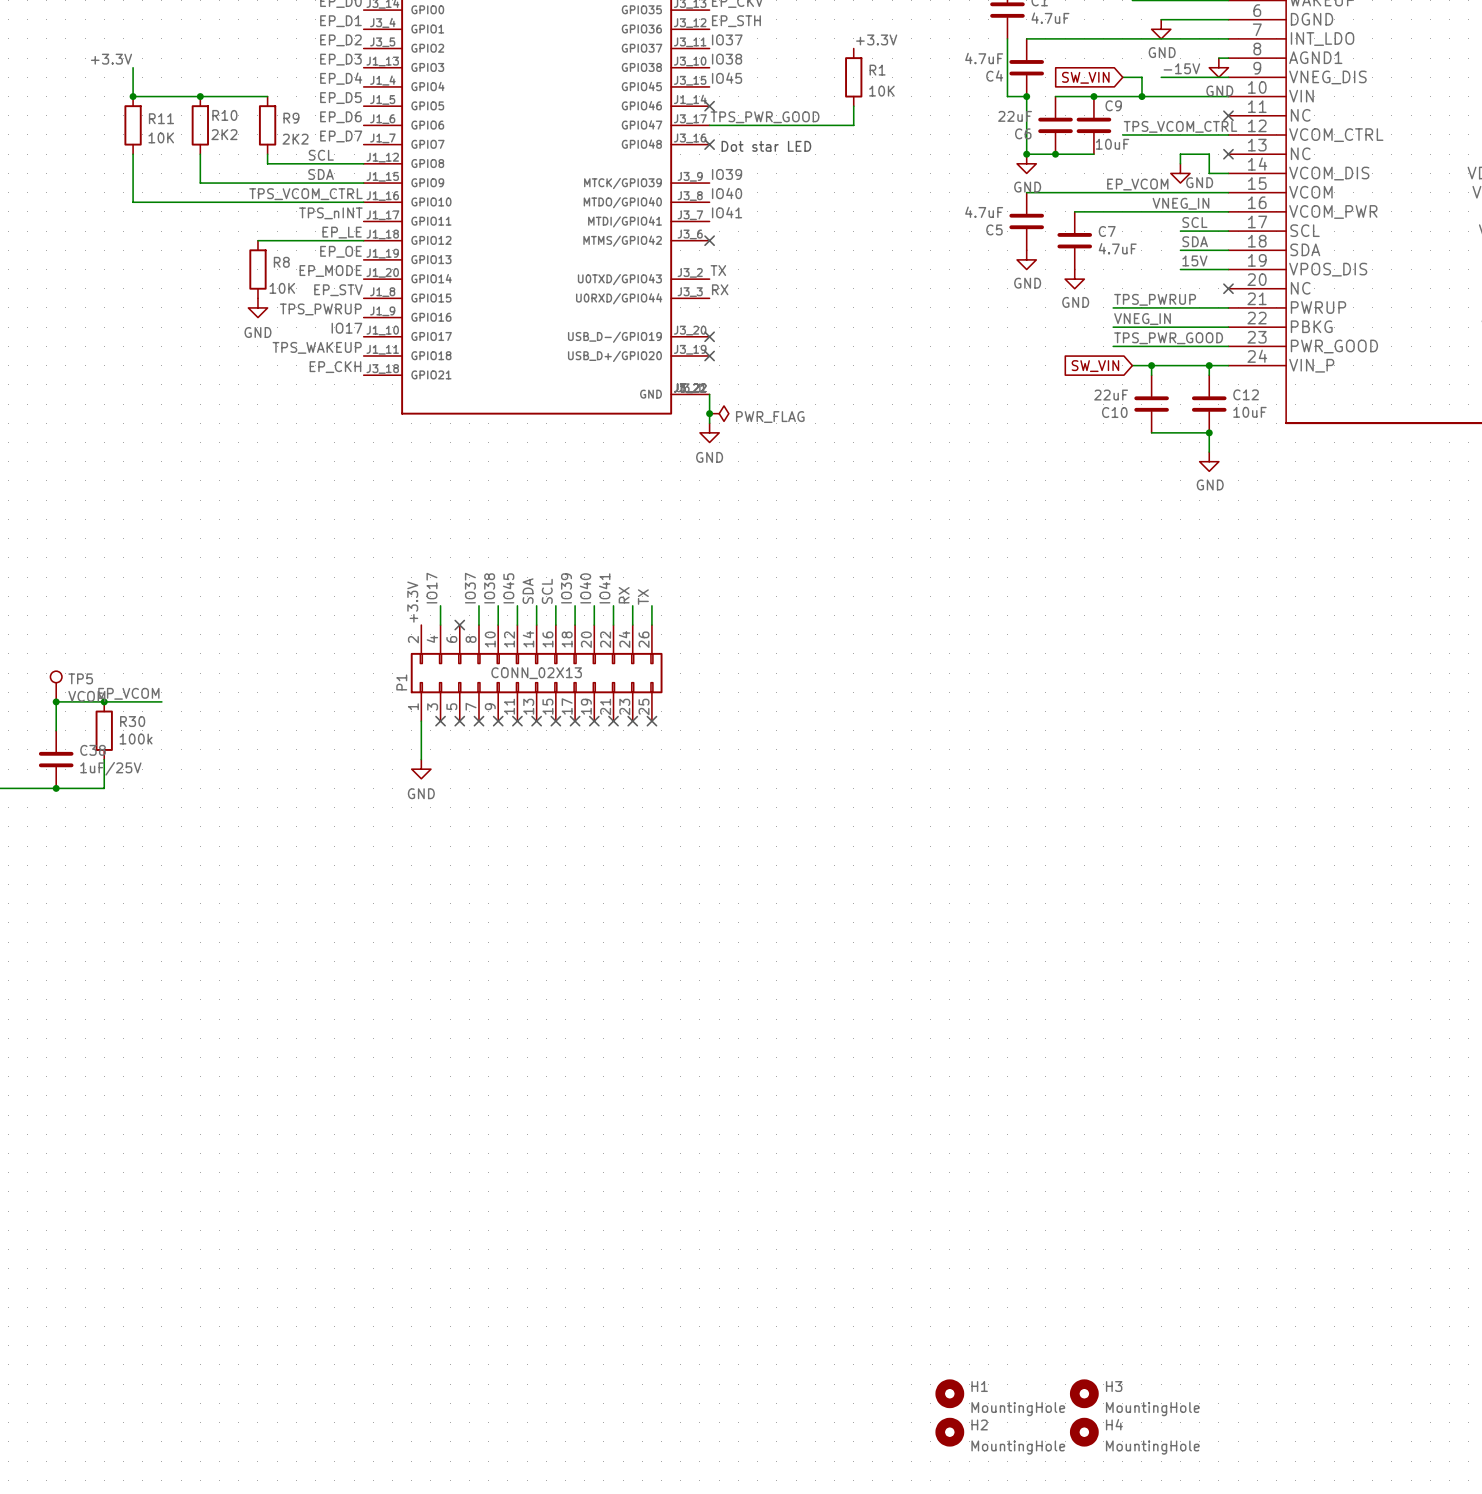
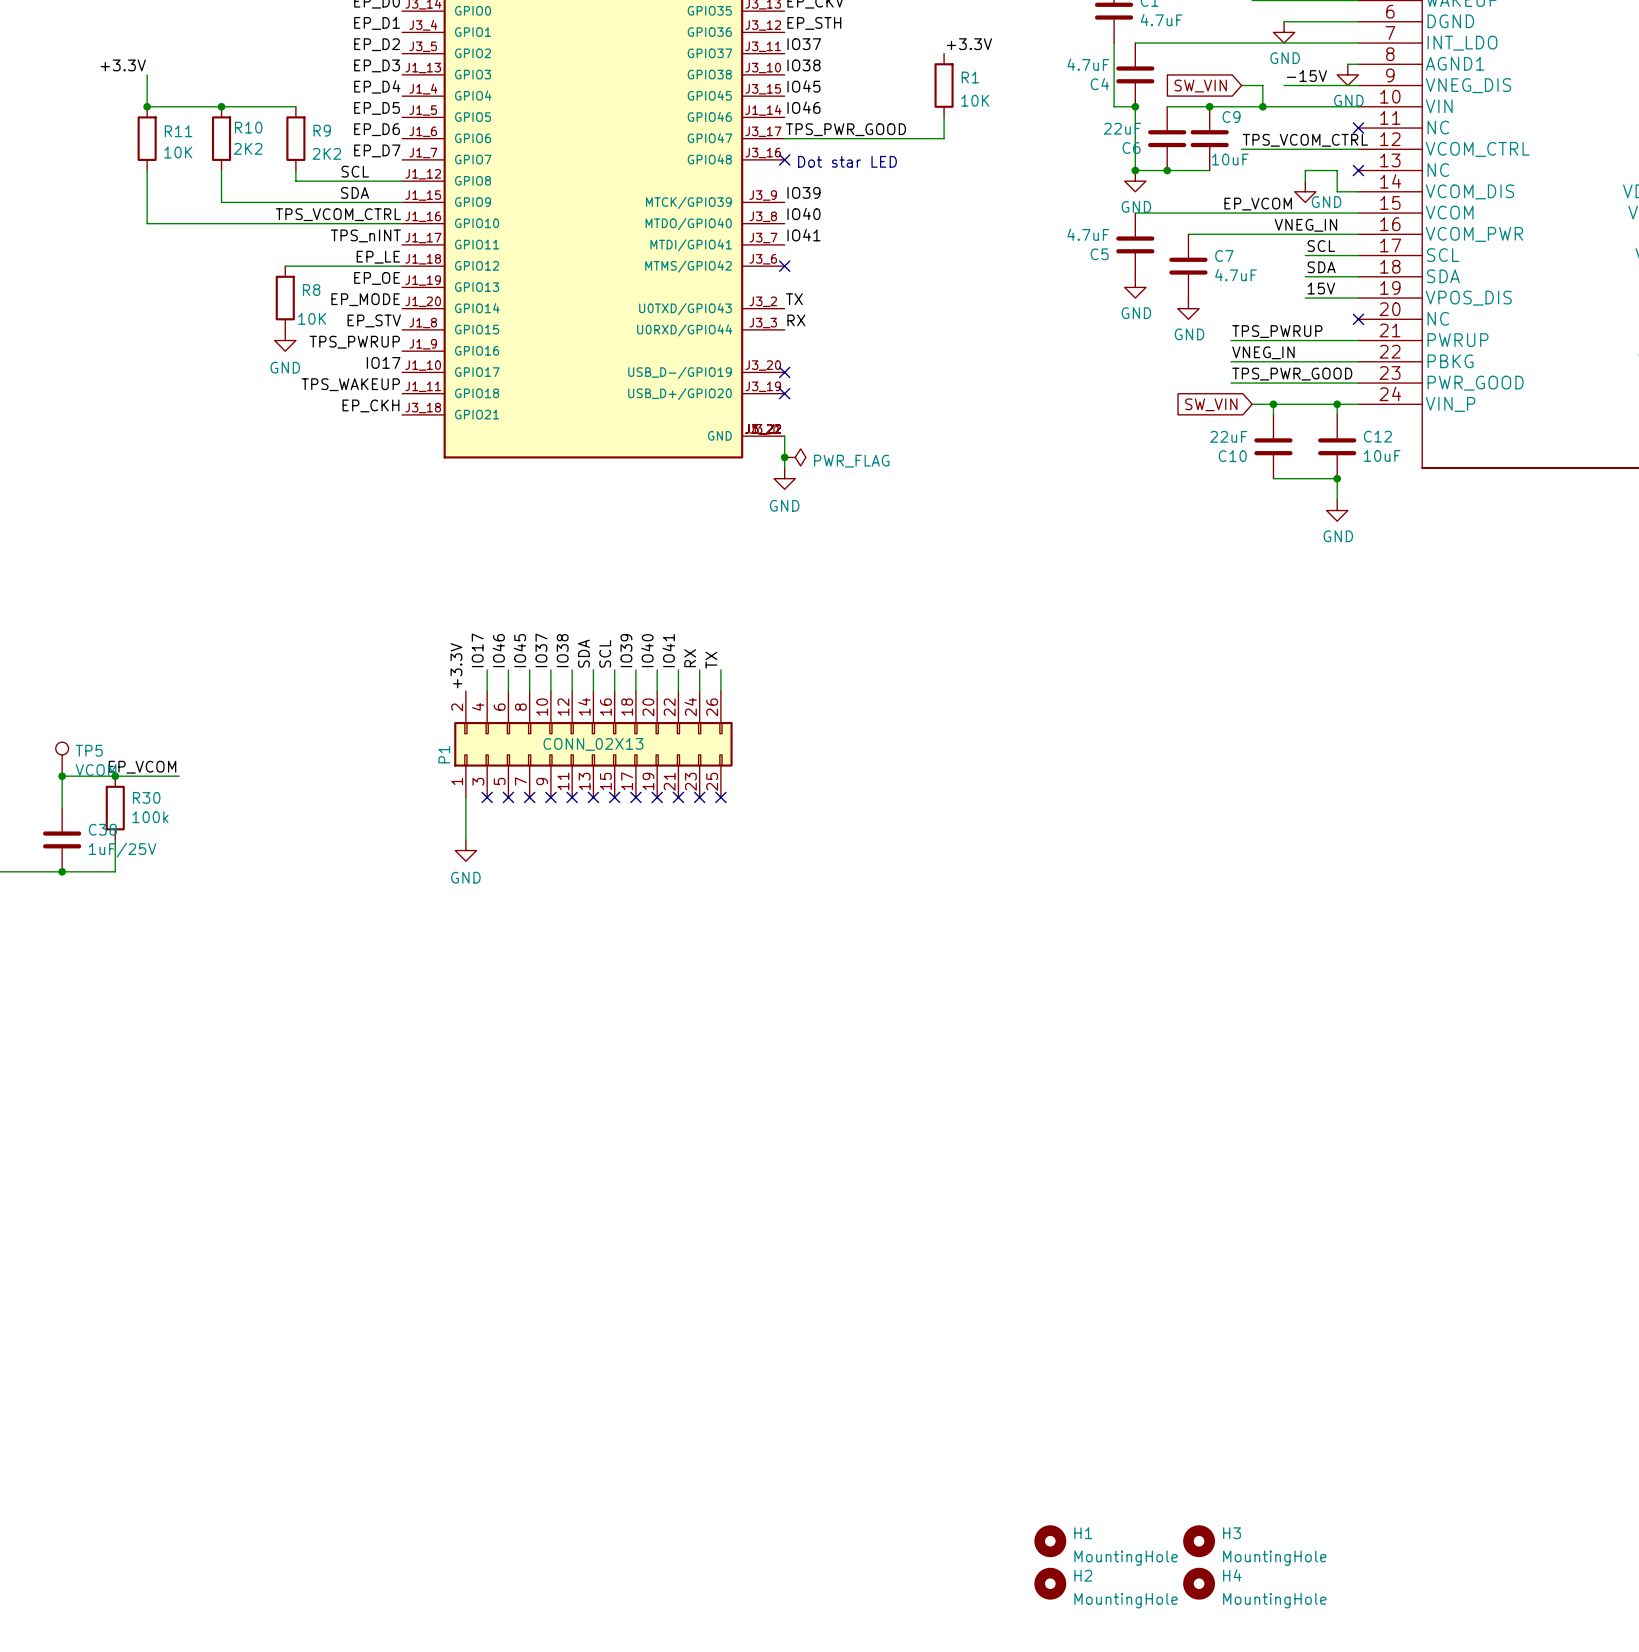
label: none -> IO46 (803, 107)
no-connect mark: (709, 106) -> none
label: none -> IO46 (498, 650)
label: IO37 (470, 588) -> IO45 (519, 650)
label: IO38 (489, 588) -> IO37 (541, 650)
label: IO45 (508, 588) -> IO38 (562, 650)
wire: none -> (508, 669) (508, 691)
no-connect mark: (459, 625) -> none

